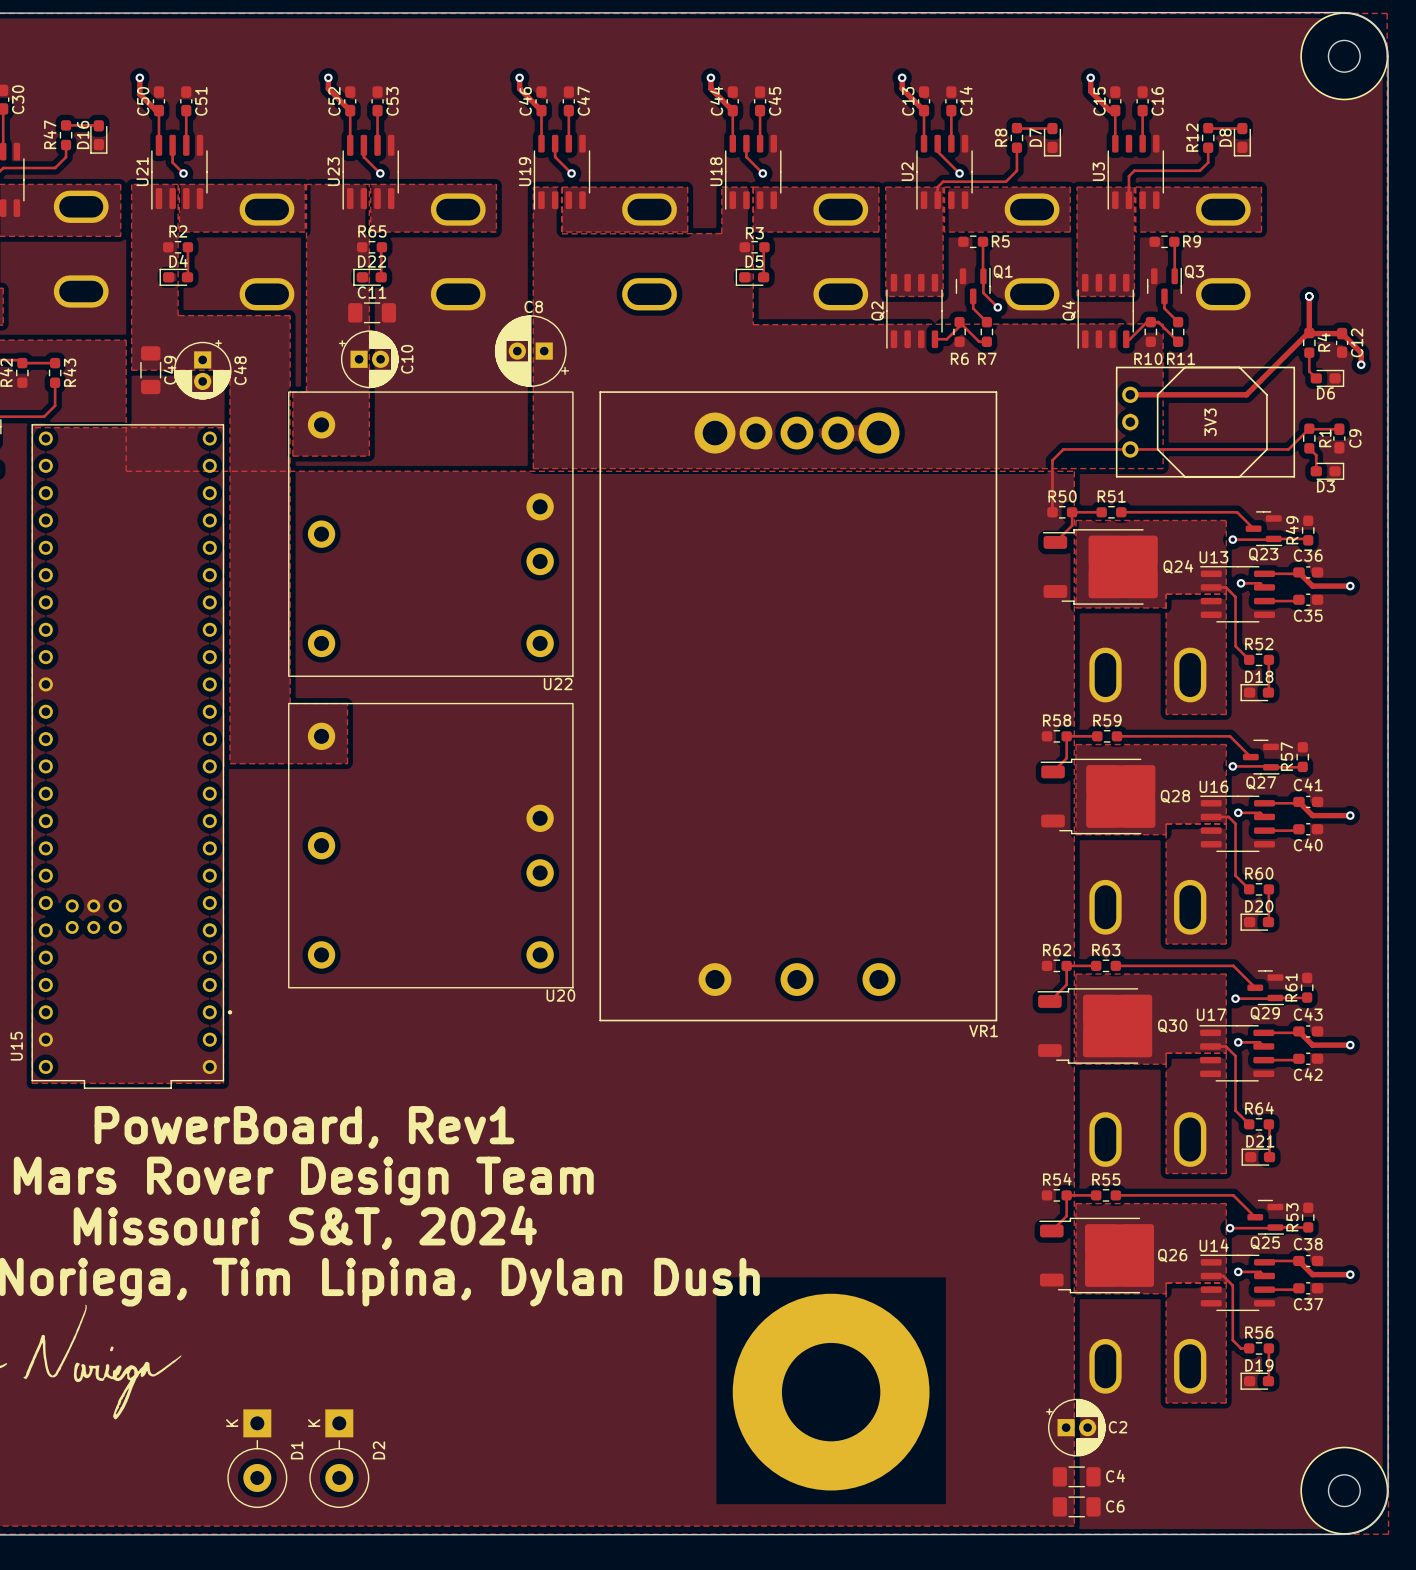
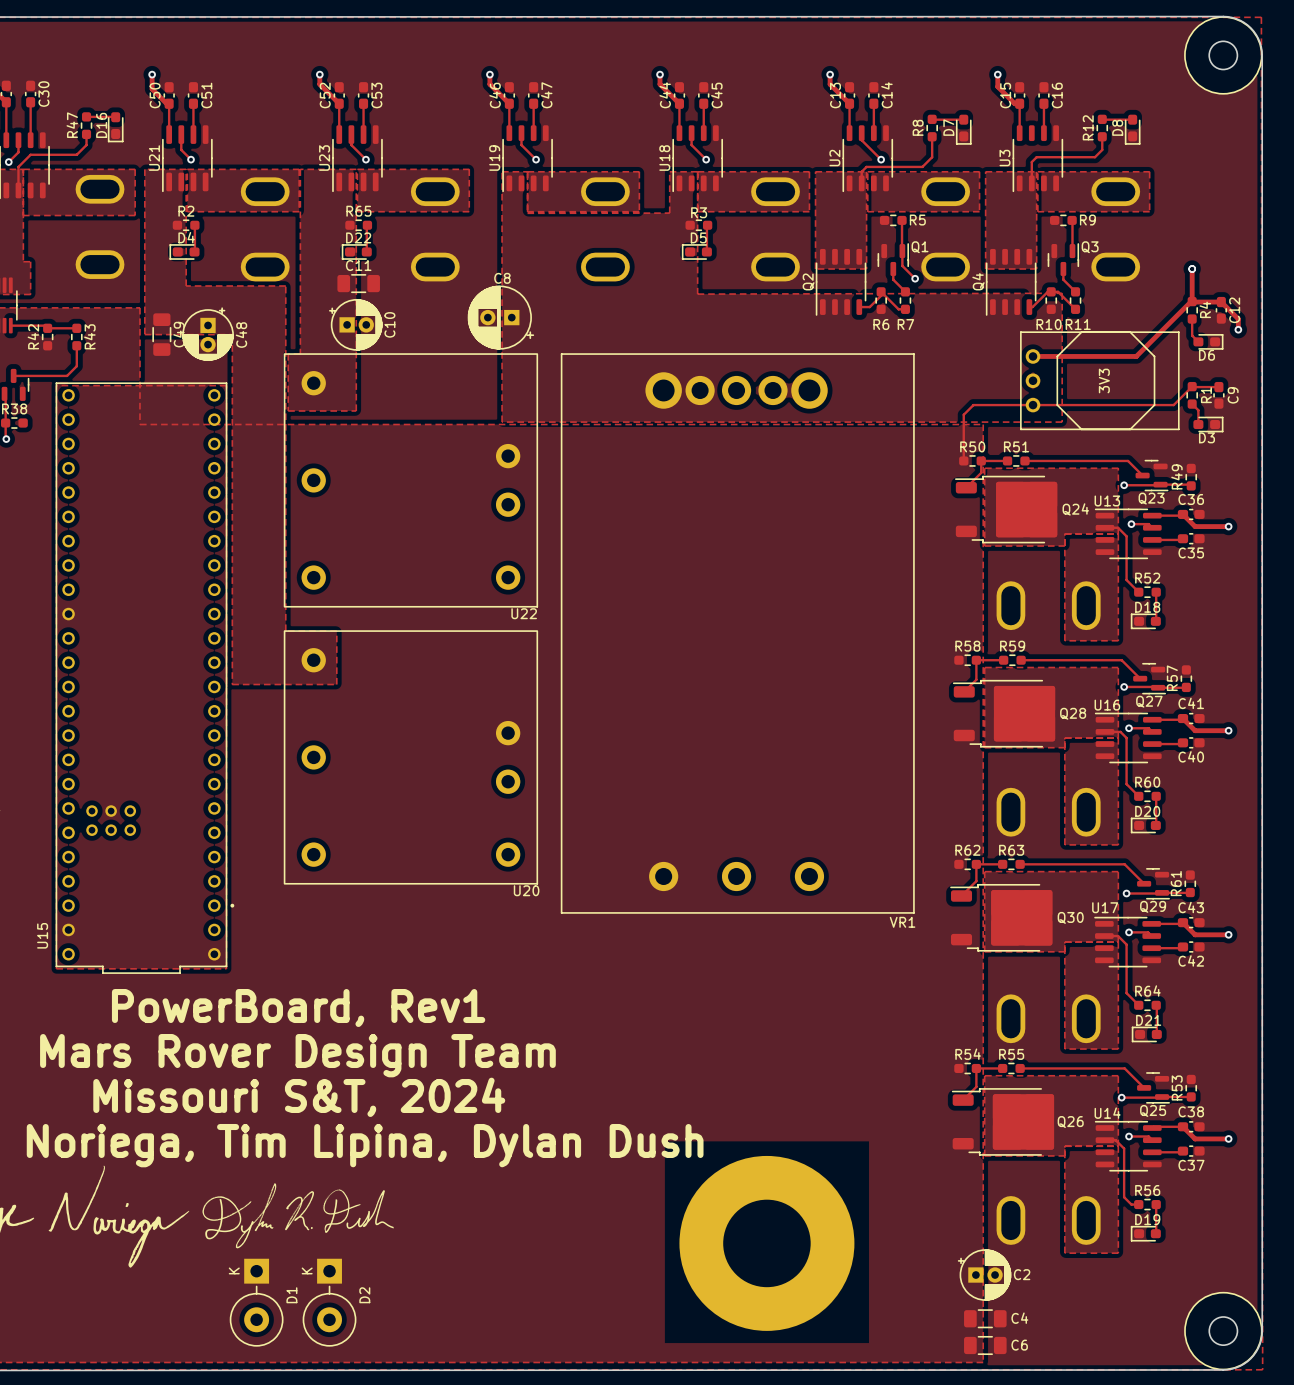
drawing: none -> [202, 1183, 394, 1253]

